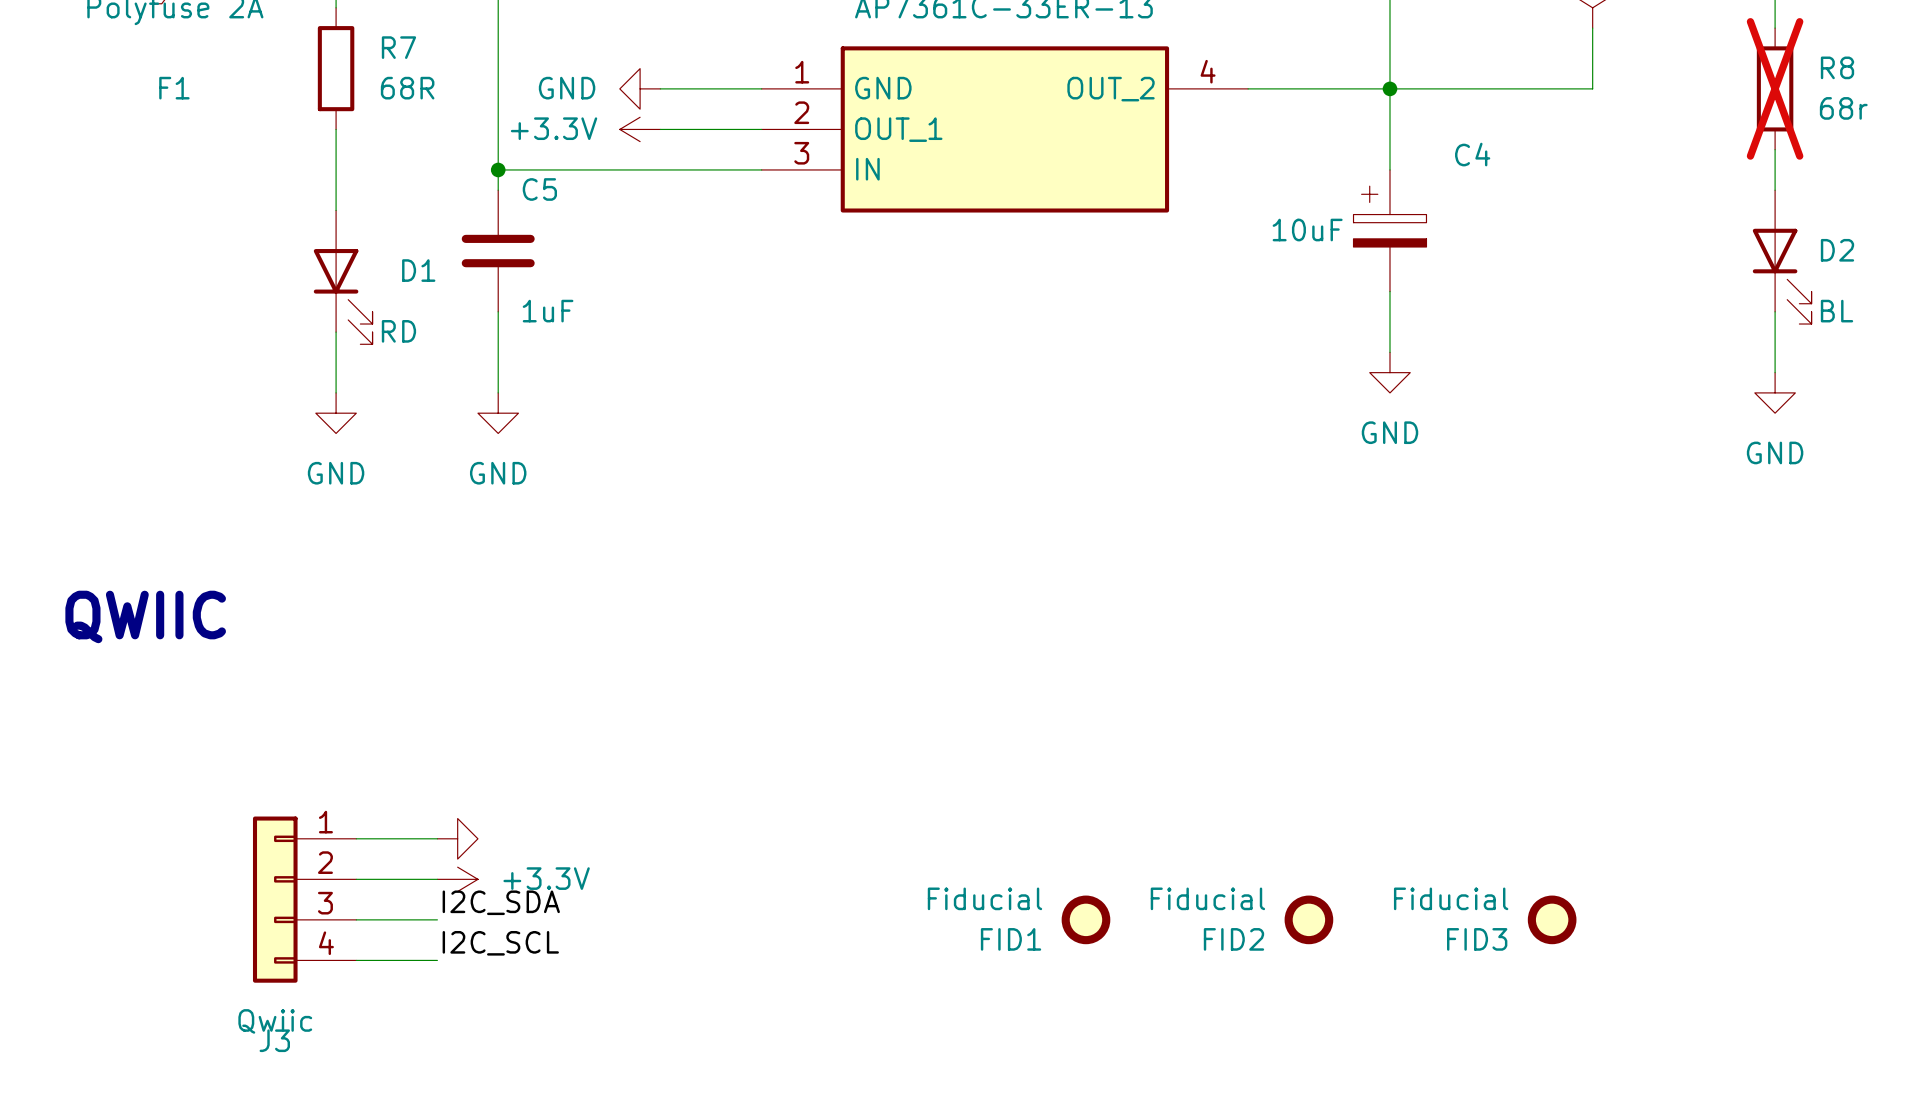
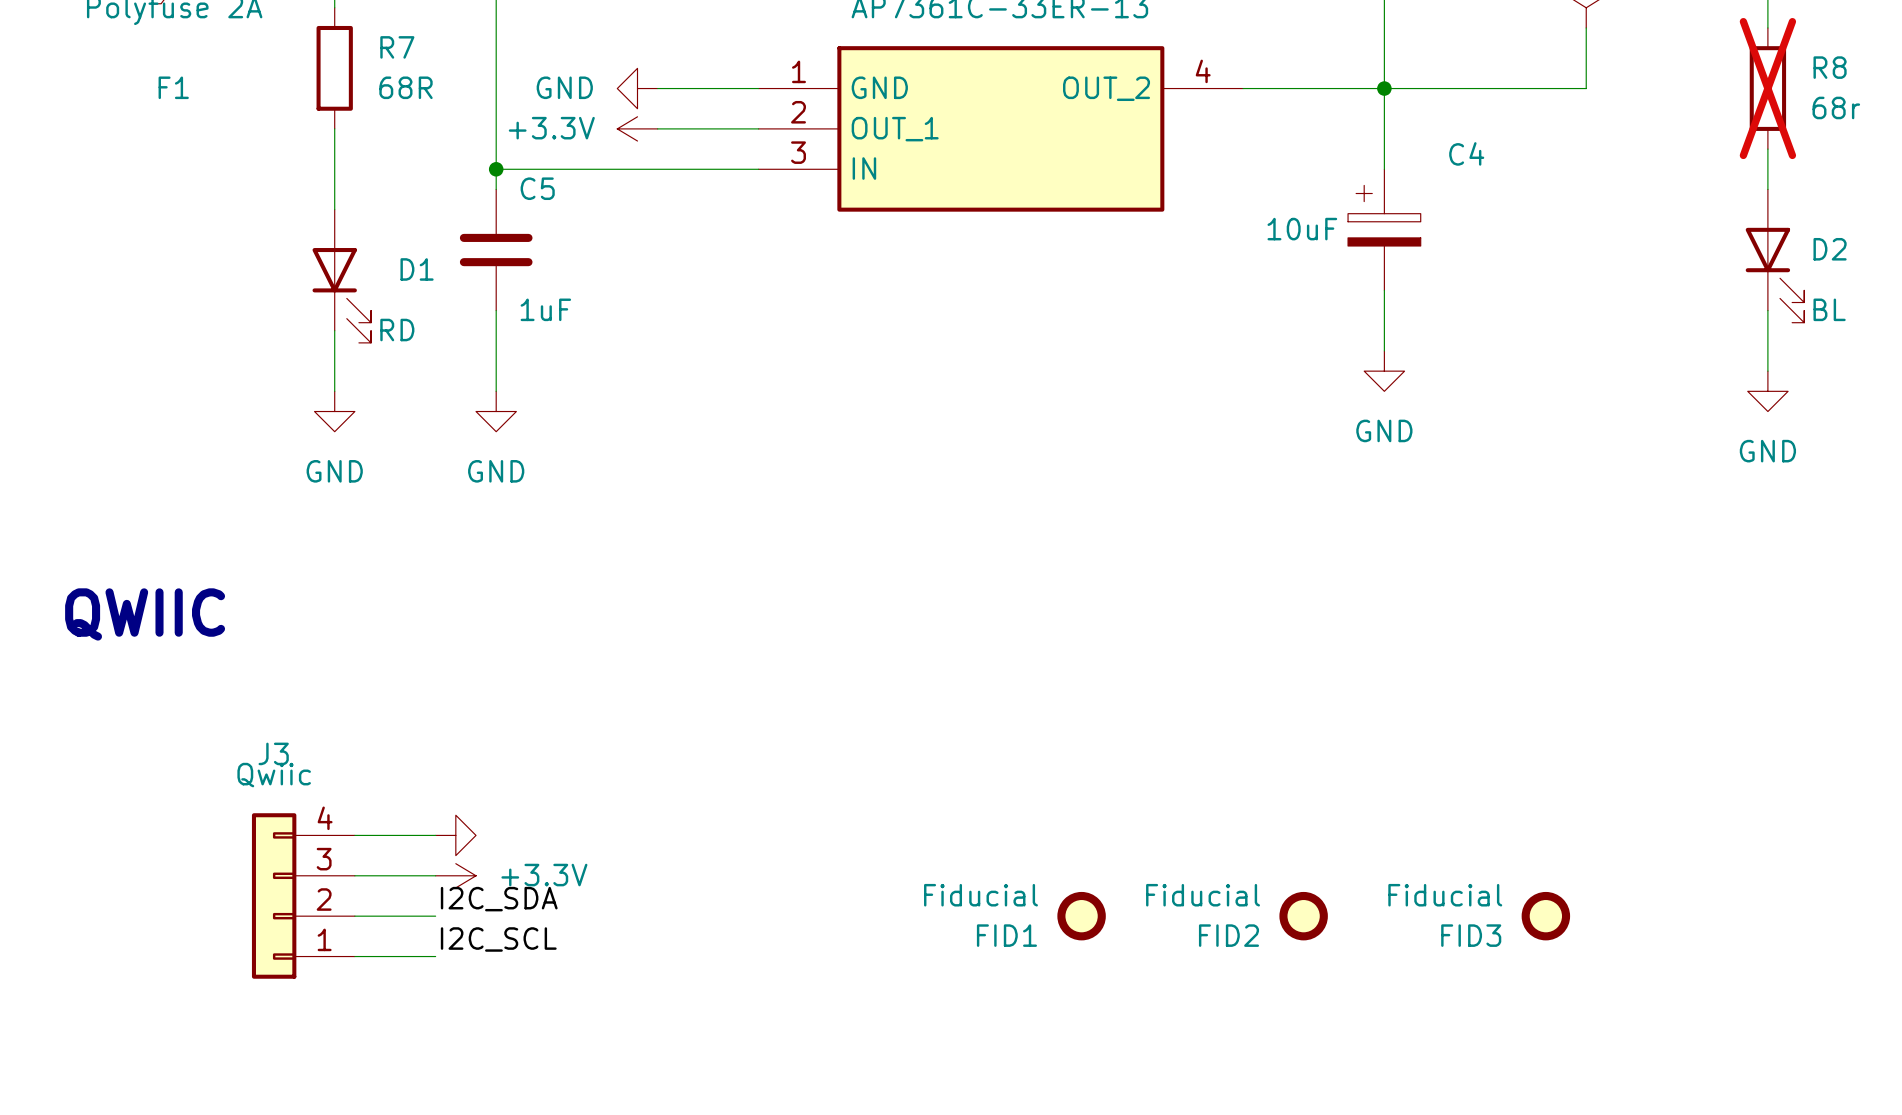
J3 flip: as is (275, 899) -> up-down (274, 895)

